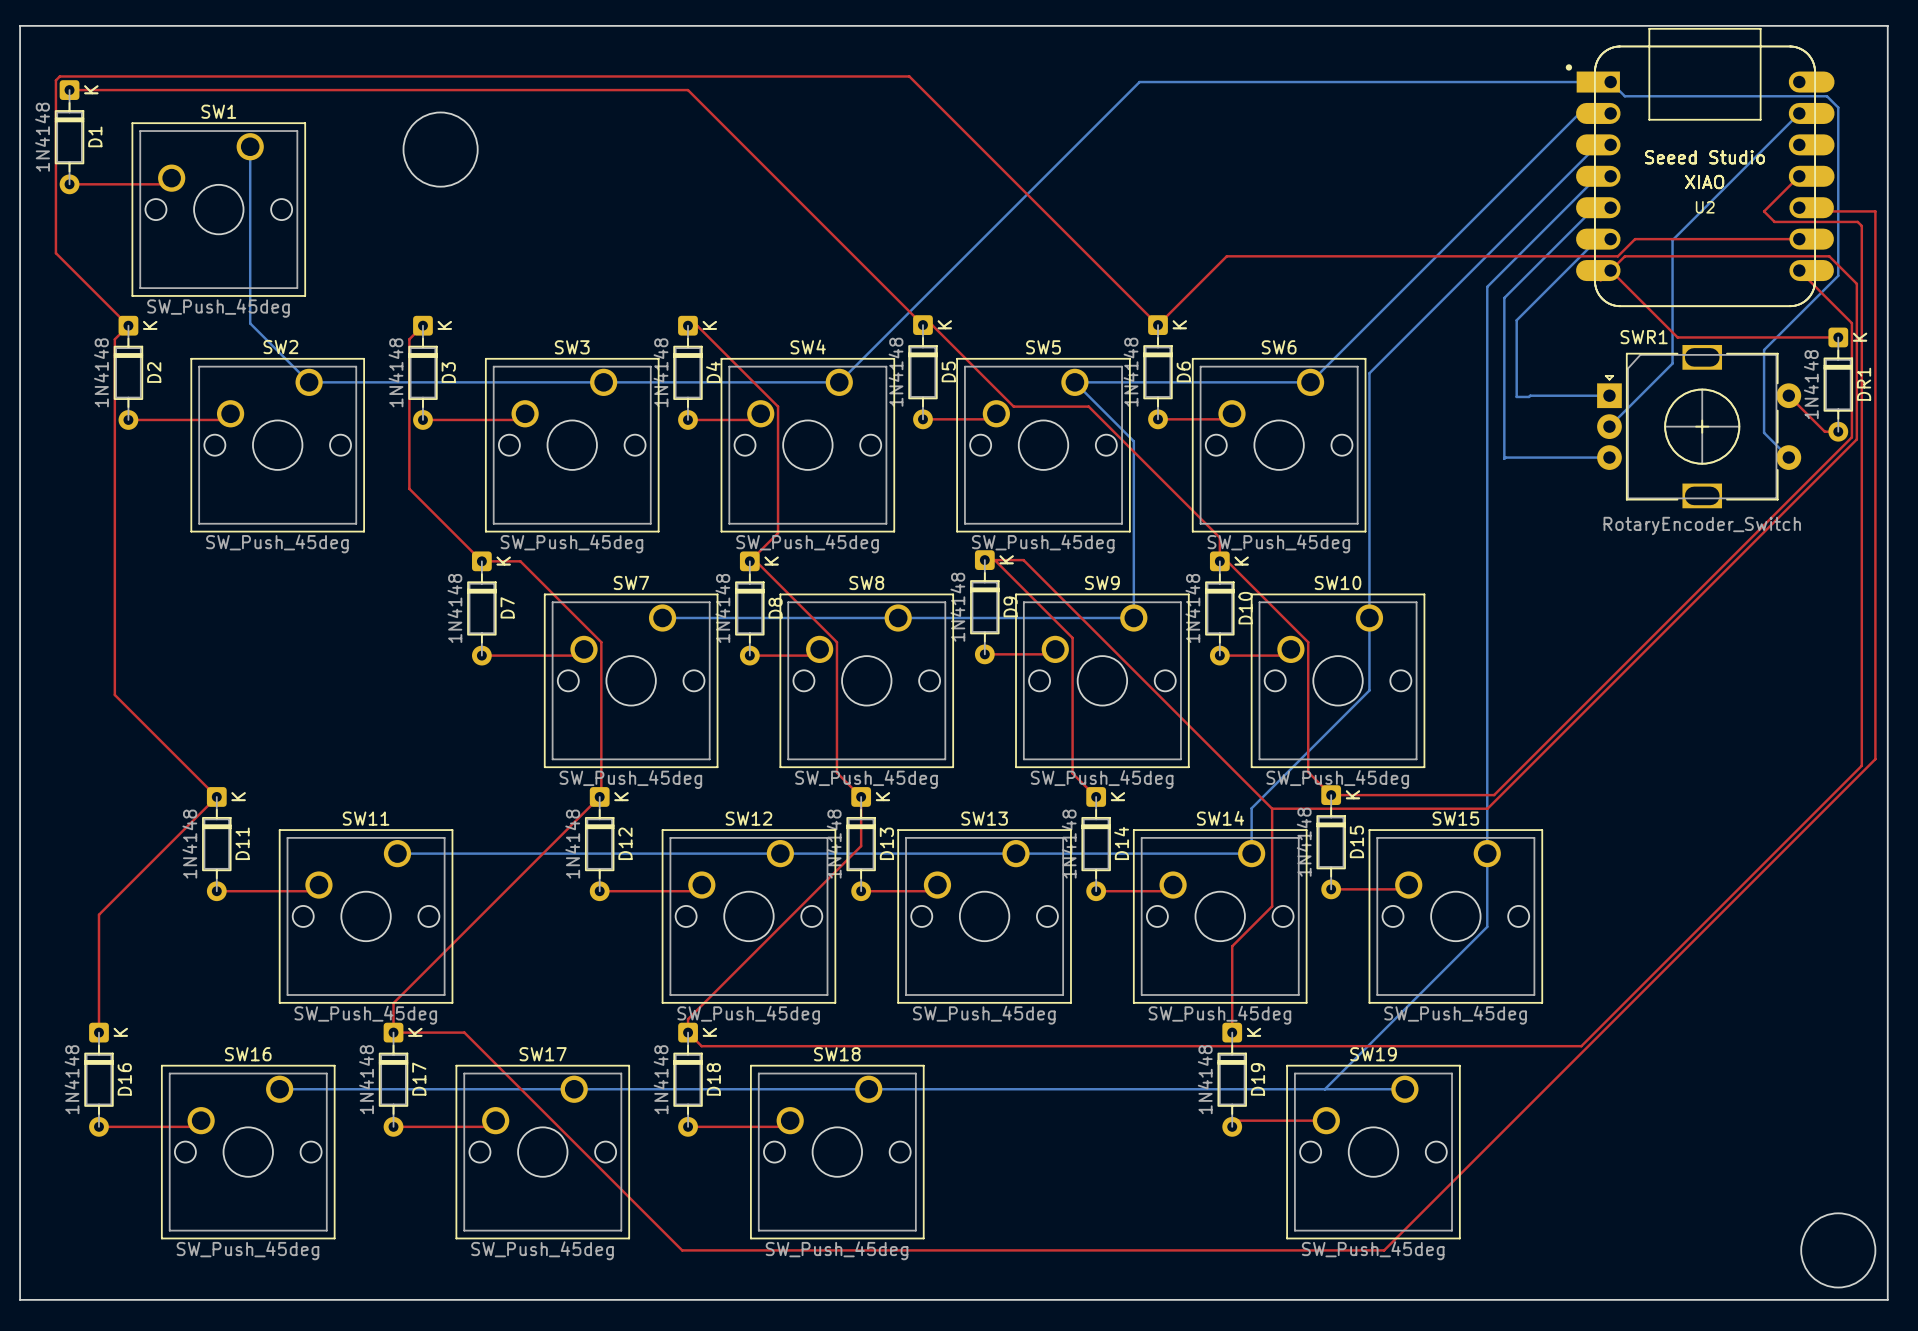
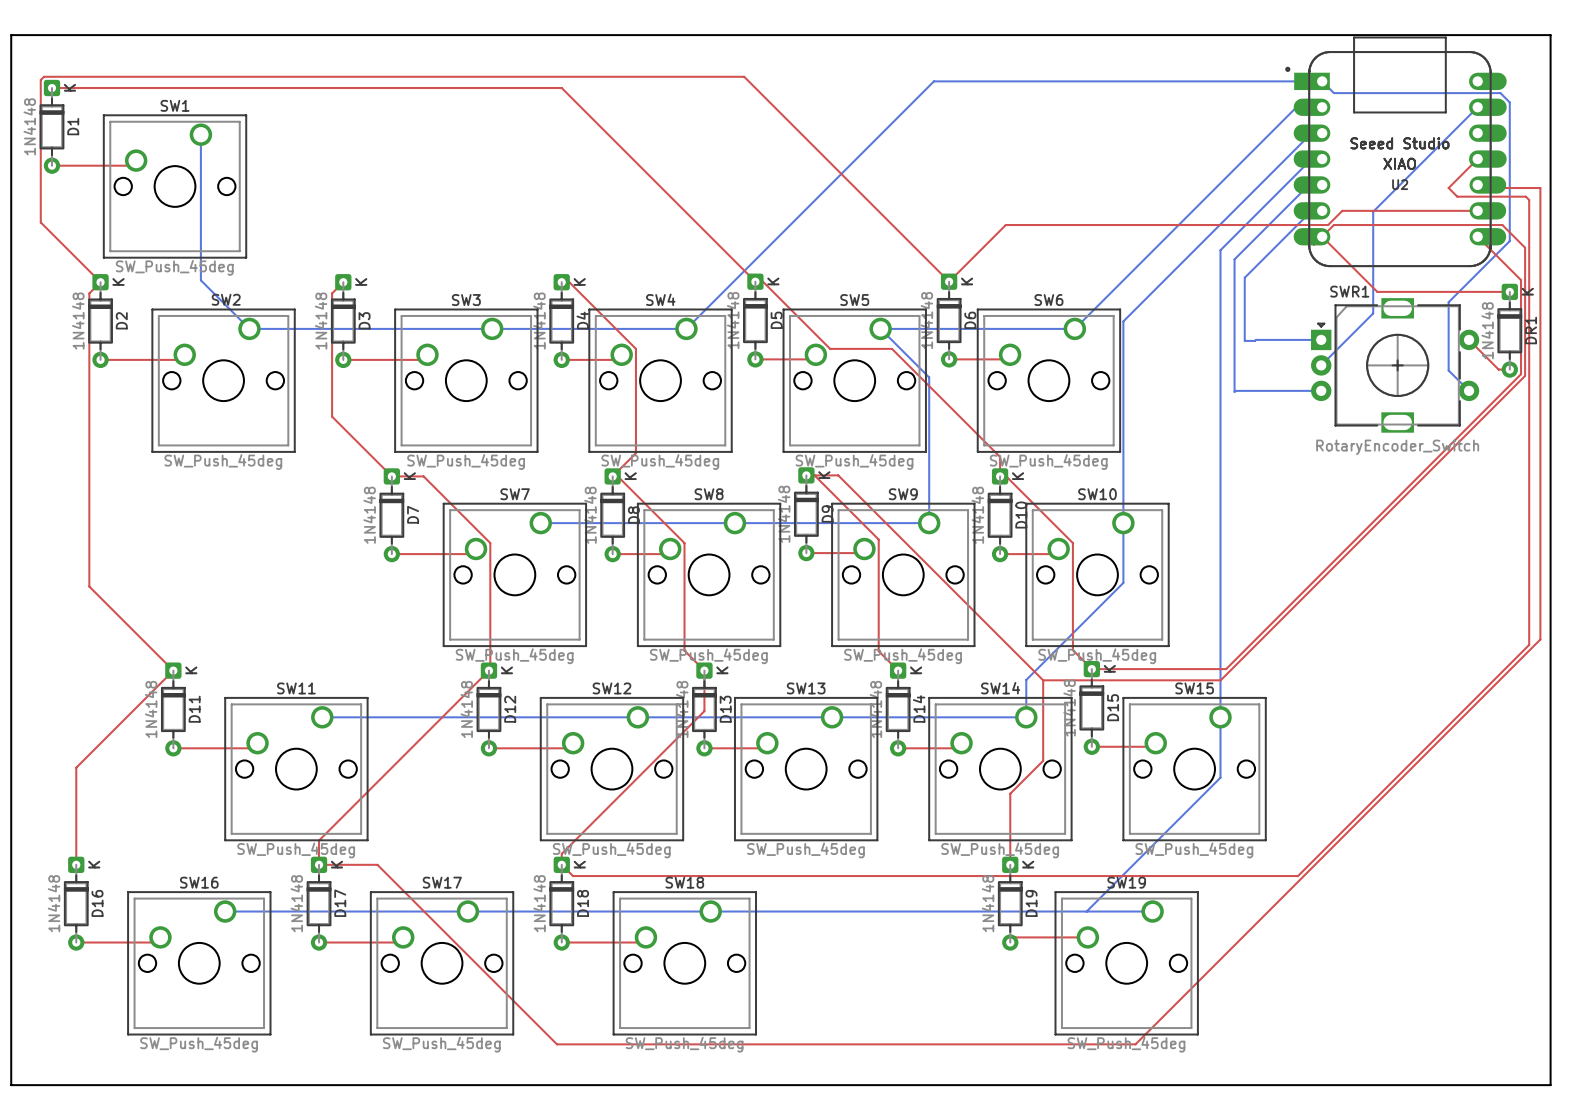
round board edge: [403, 112, 479, 187] -> none
round board edge: [1800, 1212, 1876, 1288] -> none

